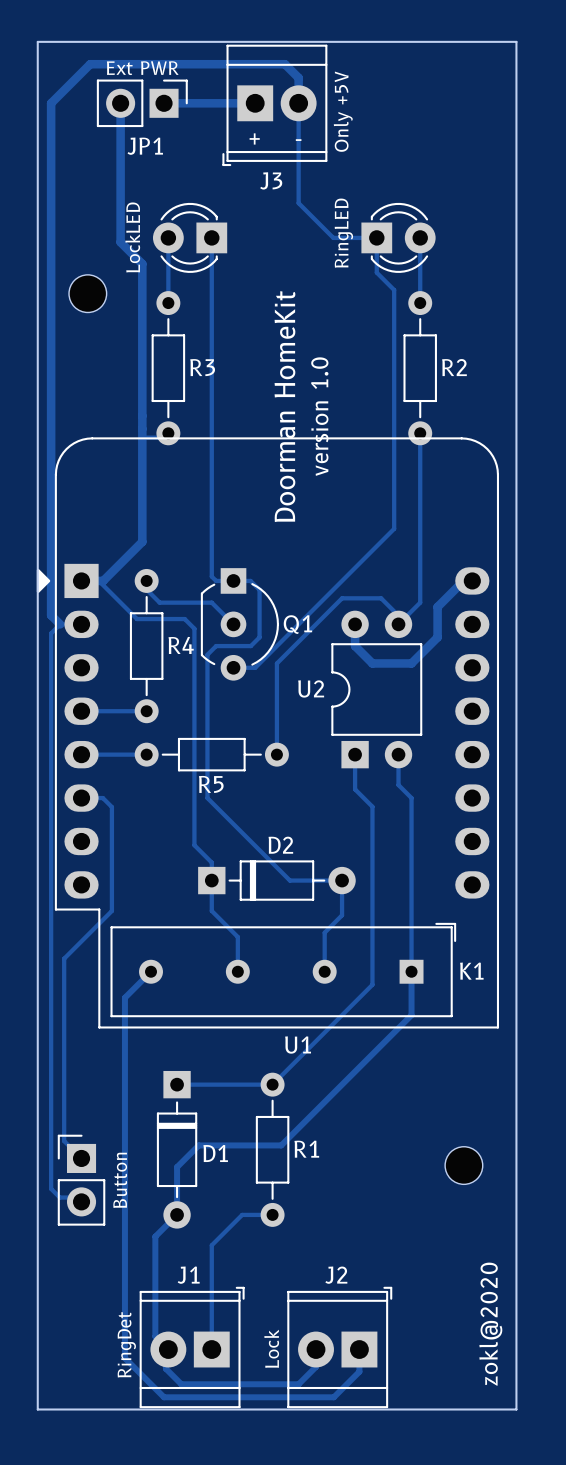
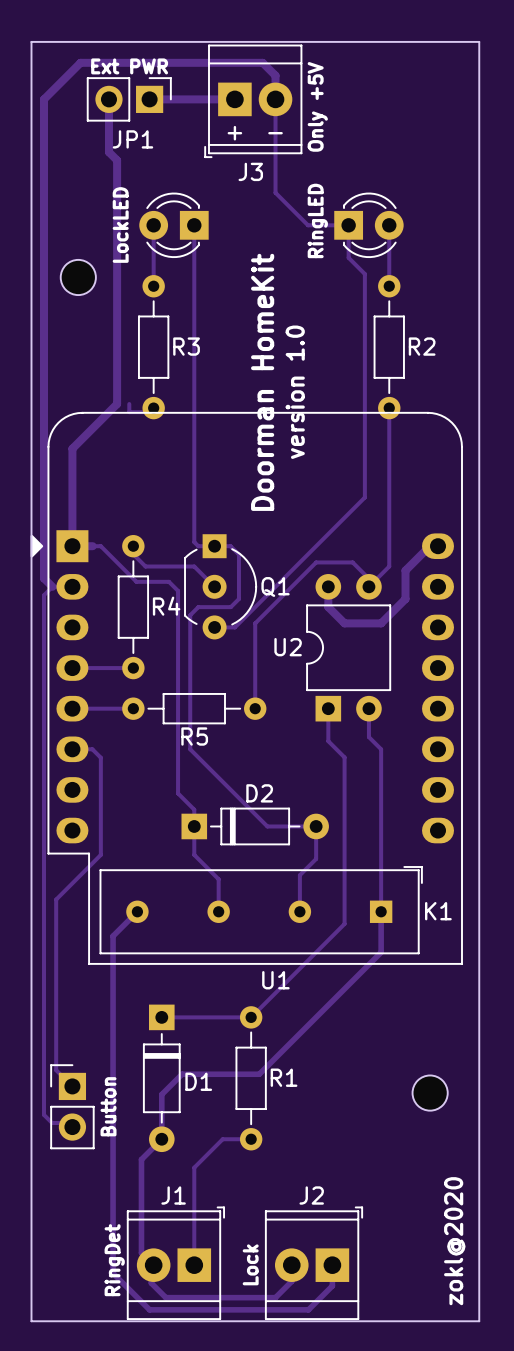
track: (120, 159) (120, 242) (142, 263) (142, 541) (103, 580) -> (108, 152) (117, 160) (117, 404) (72, 448) (72, 546)
track: (81, 580) (98, 580) (136, 619) (150, 619) -> (92, 546) (100, 546) (136, 581)

